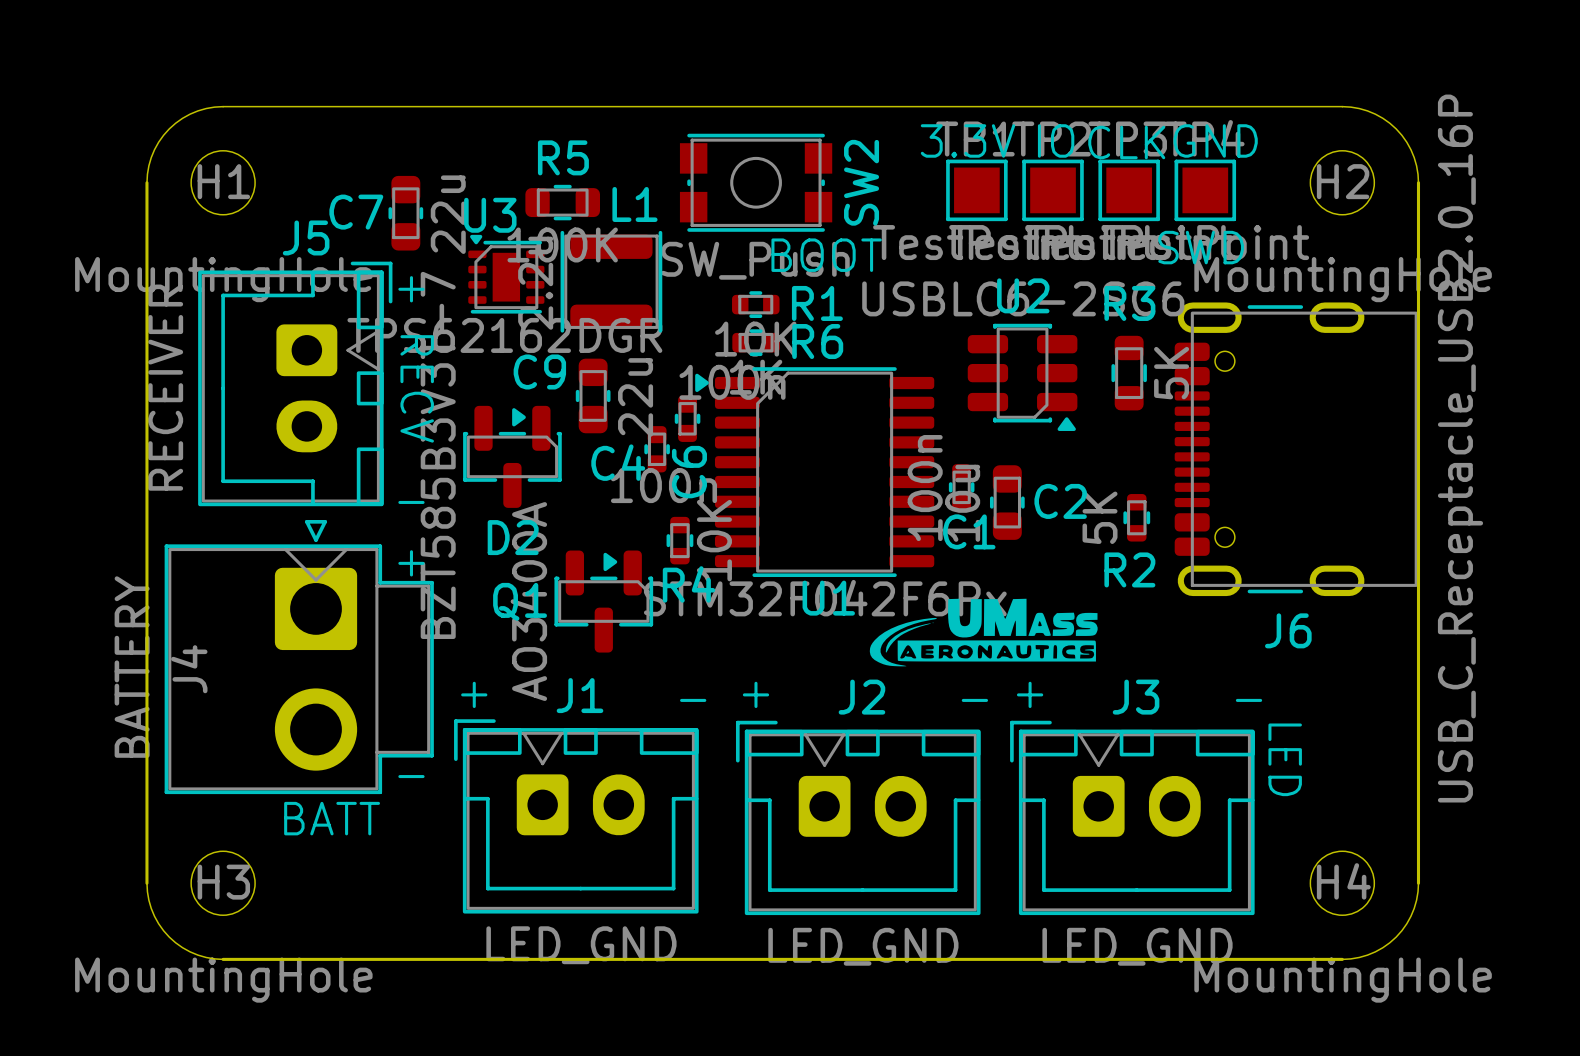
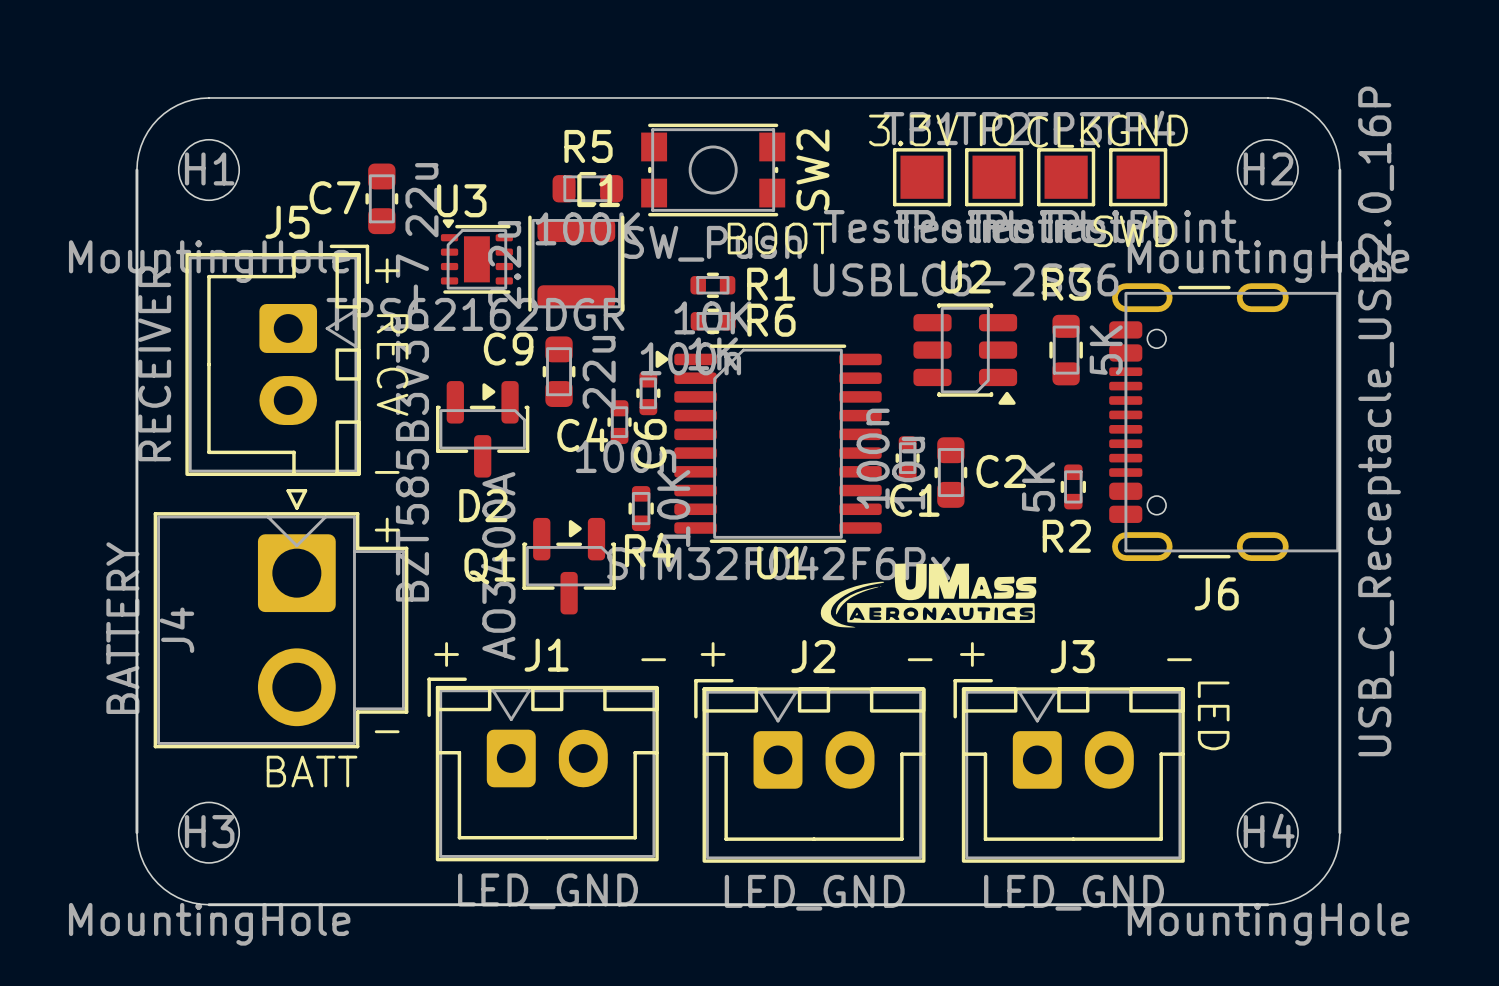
R5 position: (562, 202) -> (587, 188)

